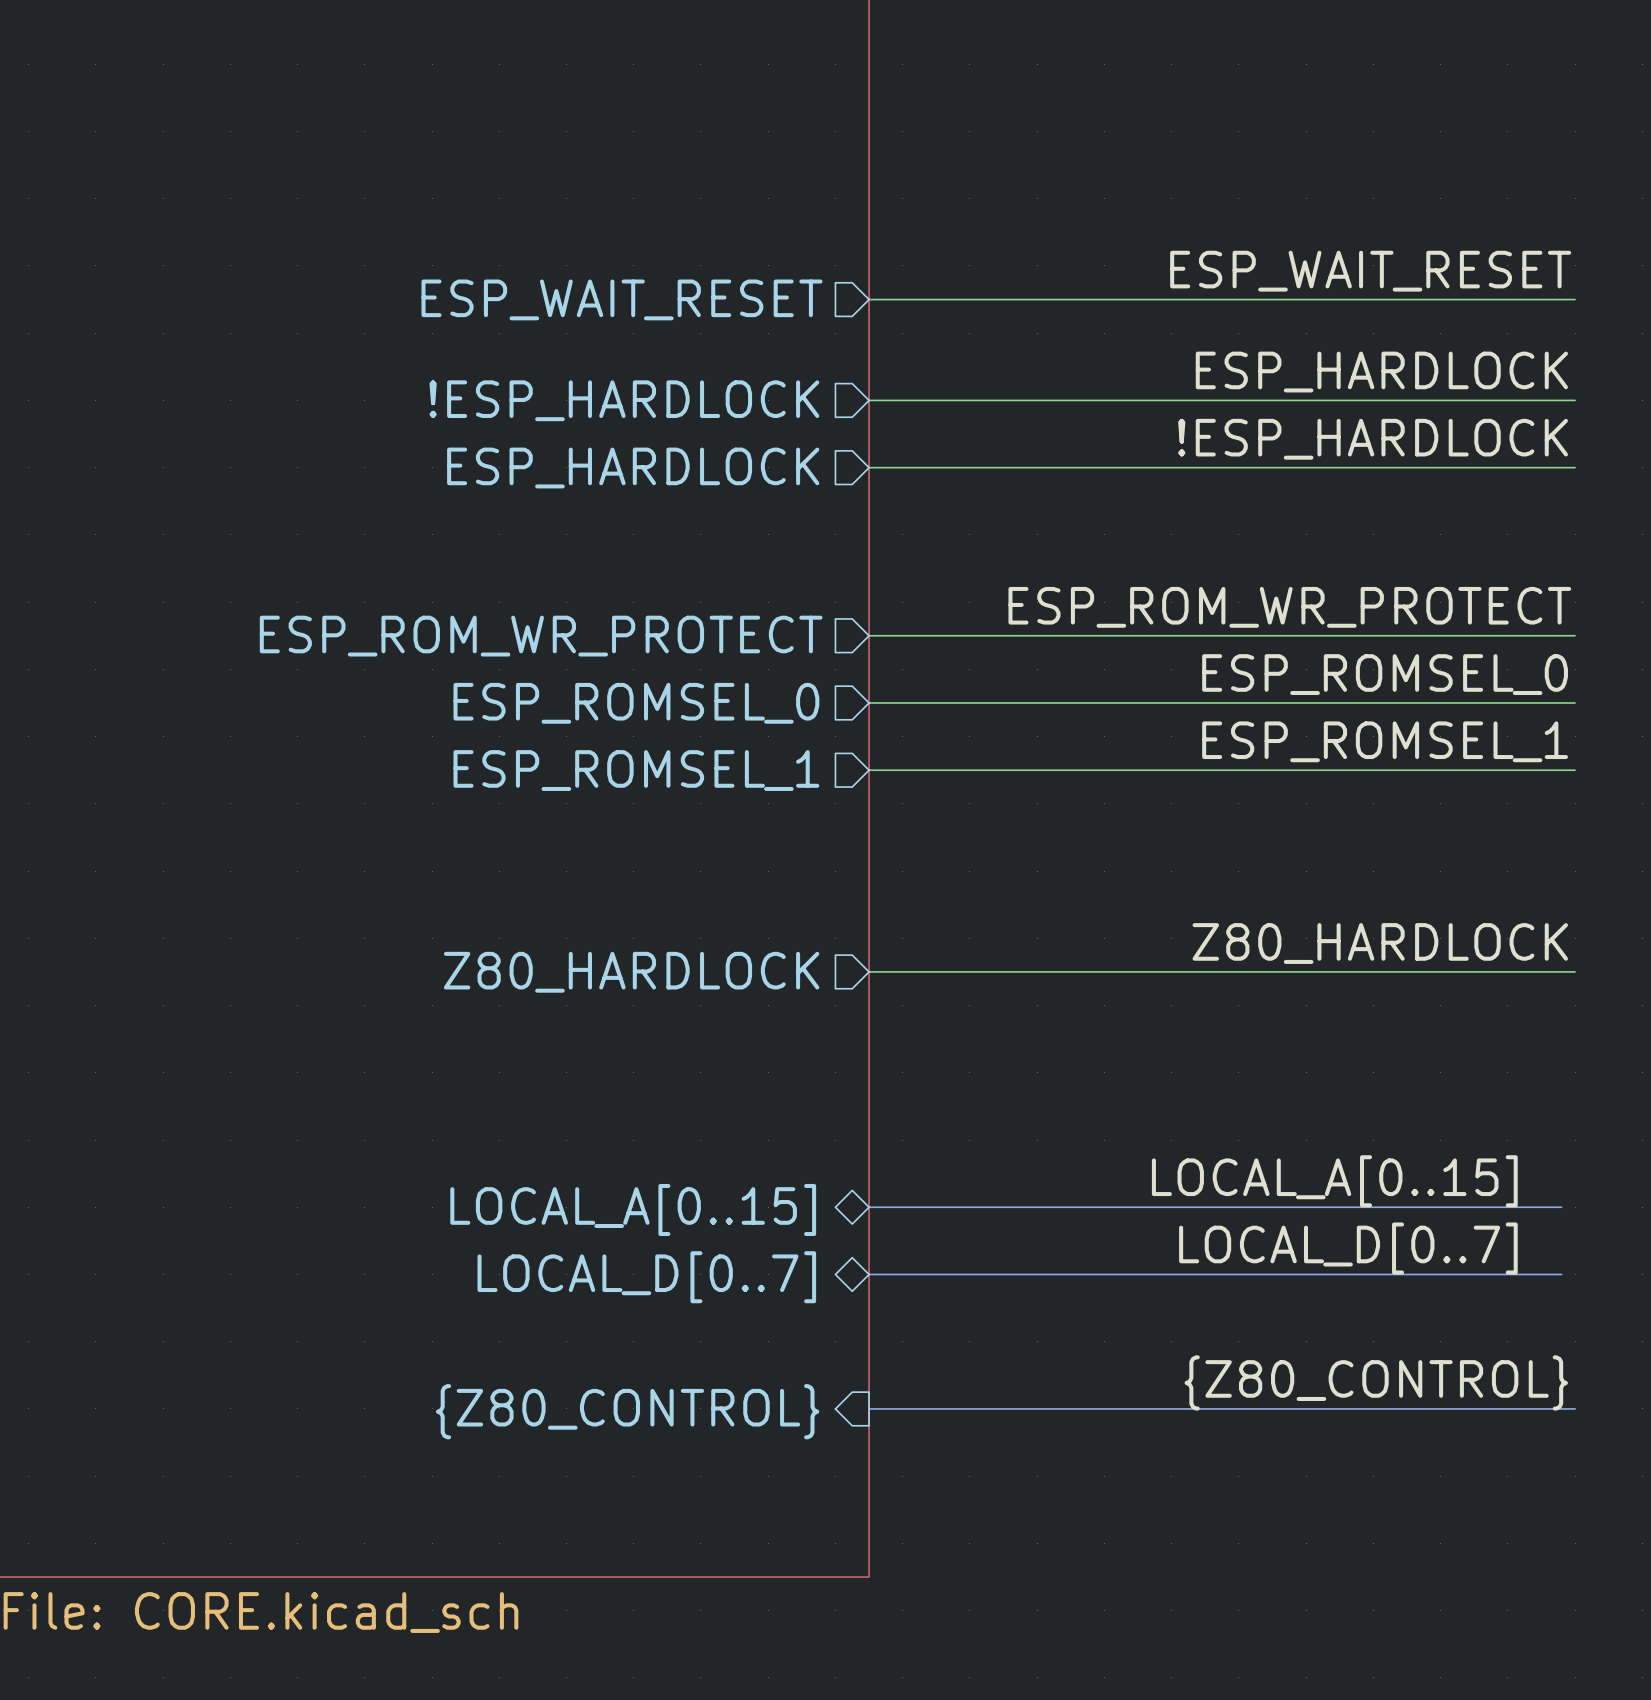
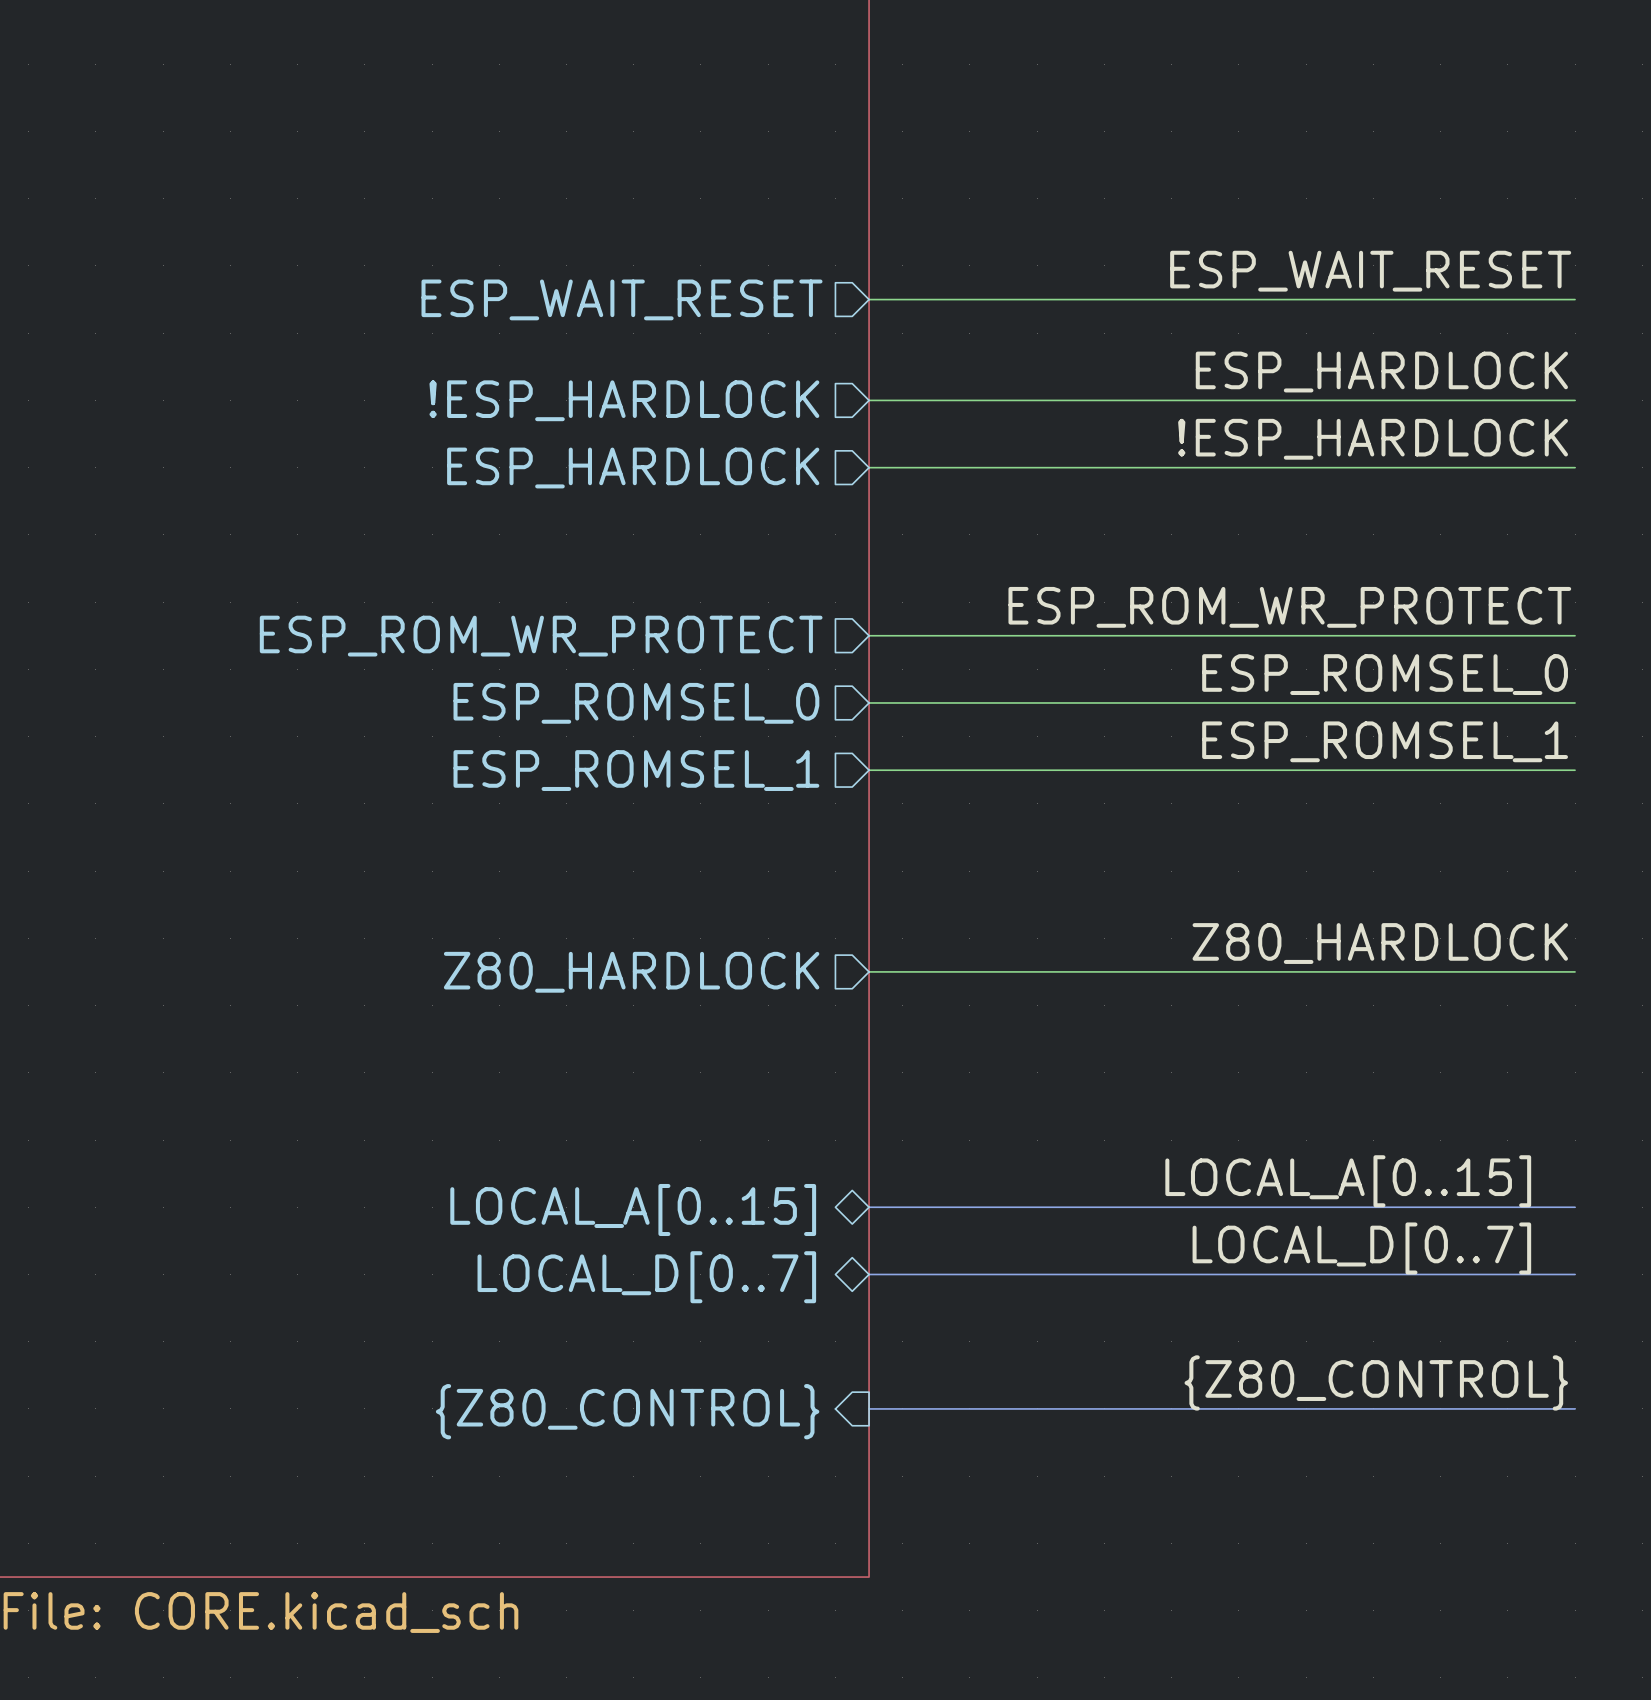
label position: LOCAL_A[0..15] (1334, 1181) -> LOCAL_A[0..15] (1348, 1181)
bus: none -> (1561, 1207) (1575, 1207)
label position: LOCAL_D[0..7] (1348, 1248) -> LOCAL_D[0..7] (1361, 1248)
bus: none -> (1561, 1274) (1575, 1274)

